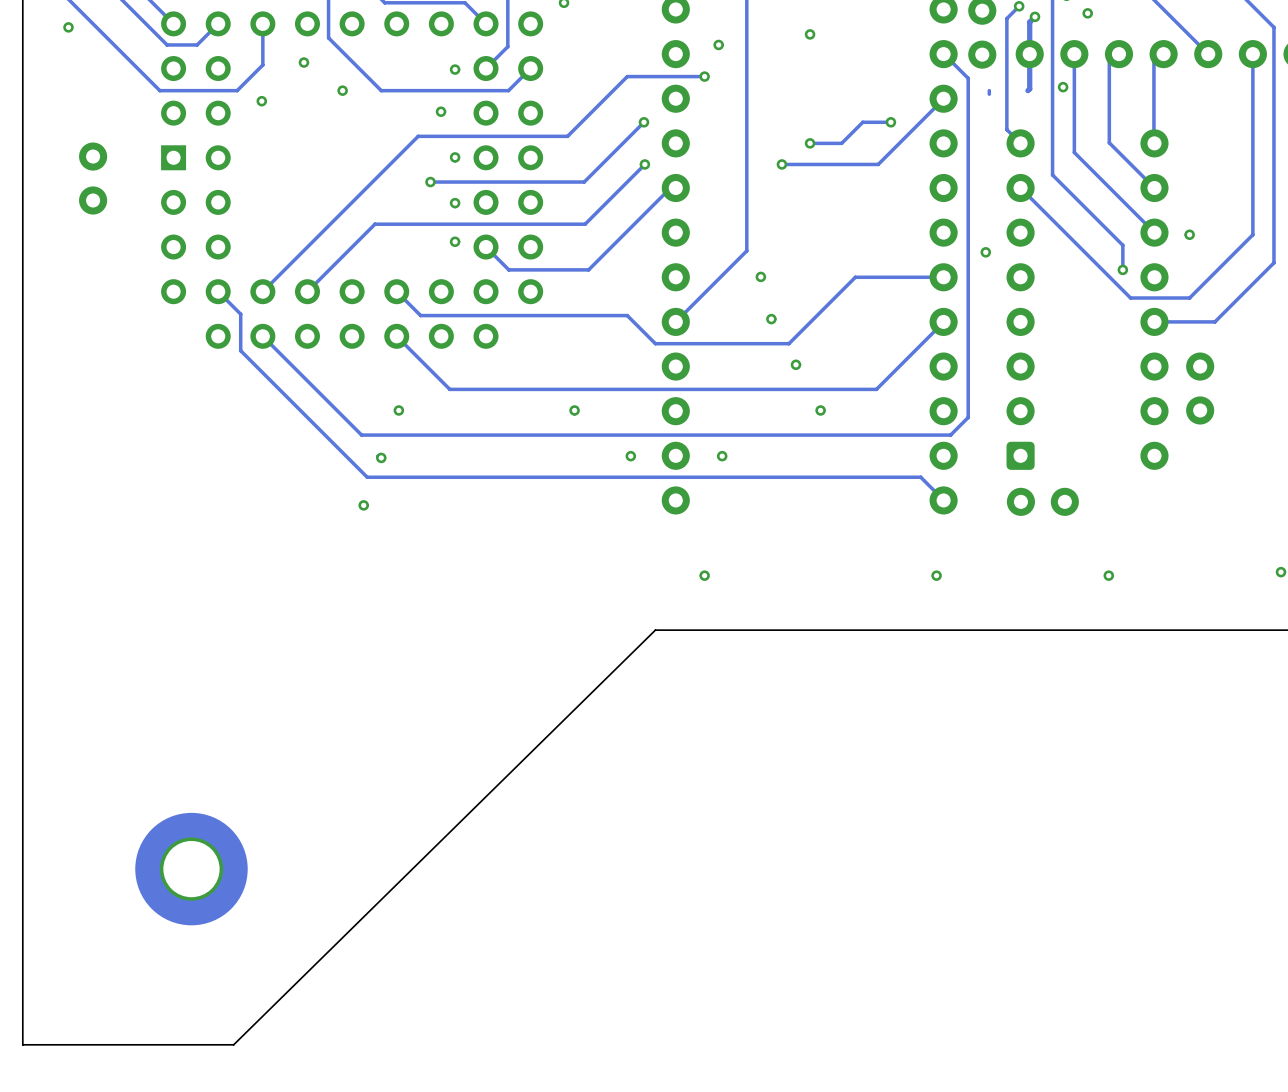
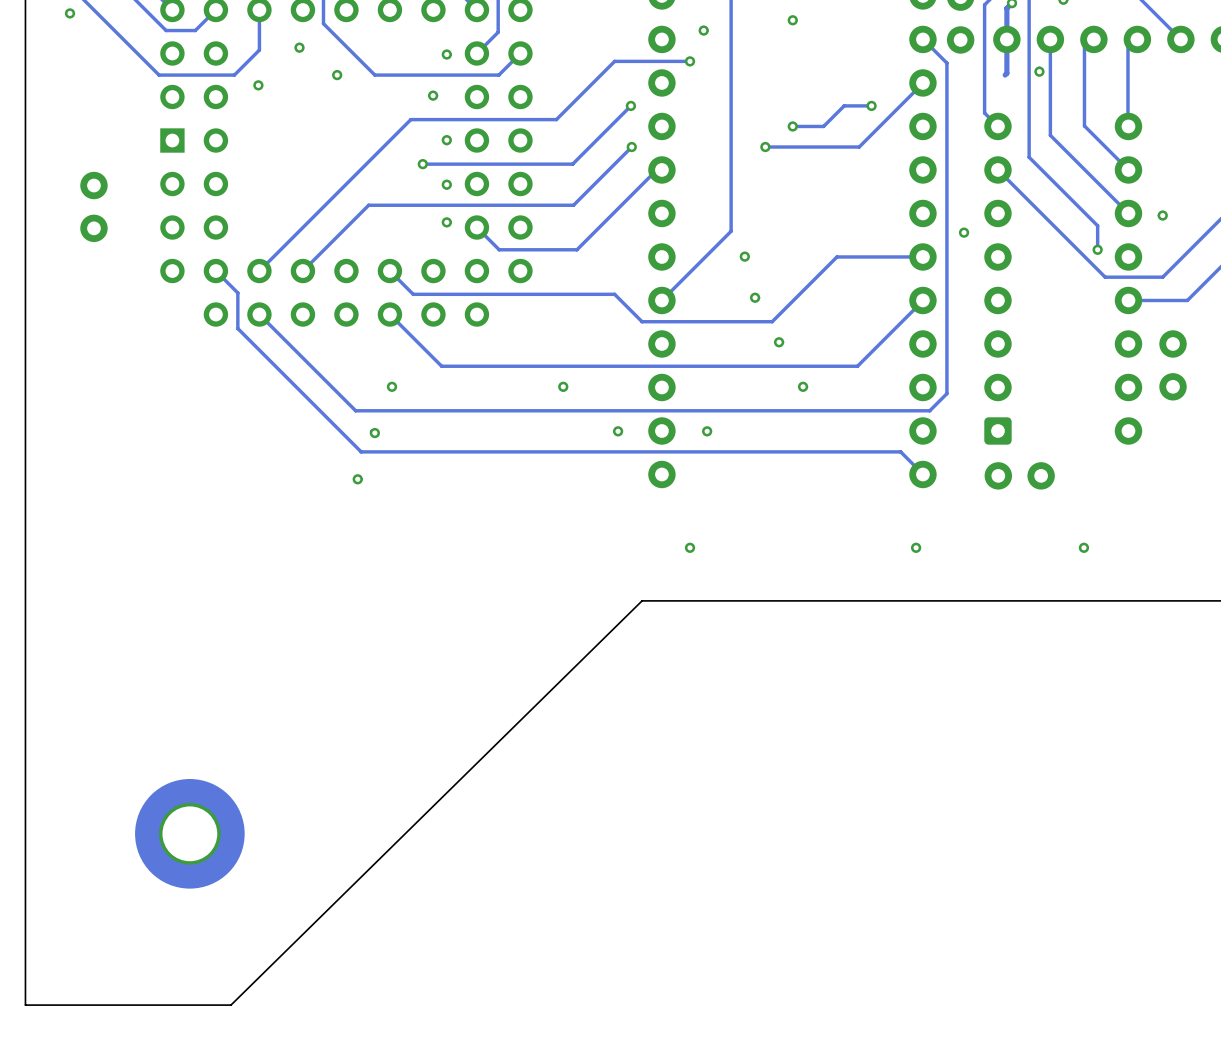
track: (989, 90) (989, 94) -> none
part position: (93, 178) -> (93, 206)

